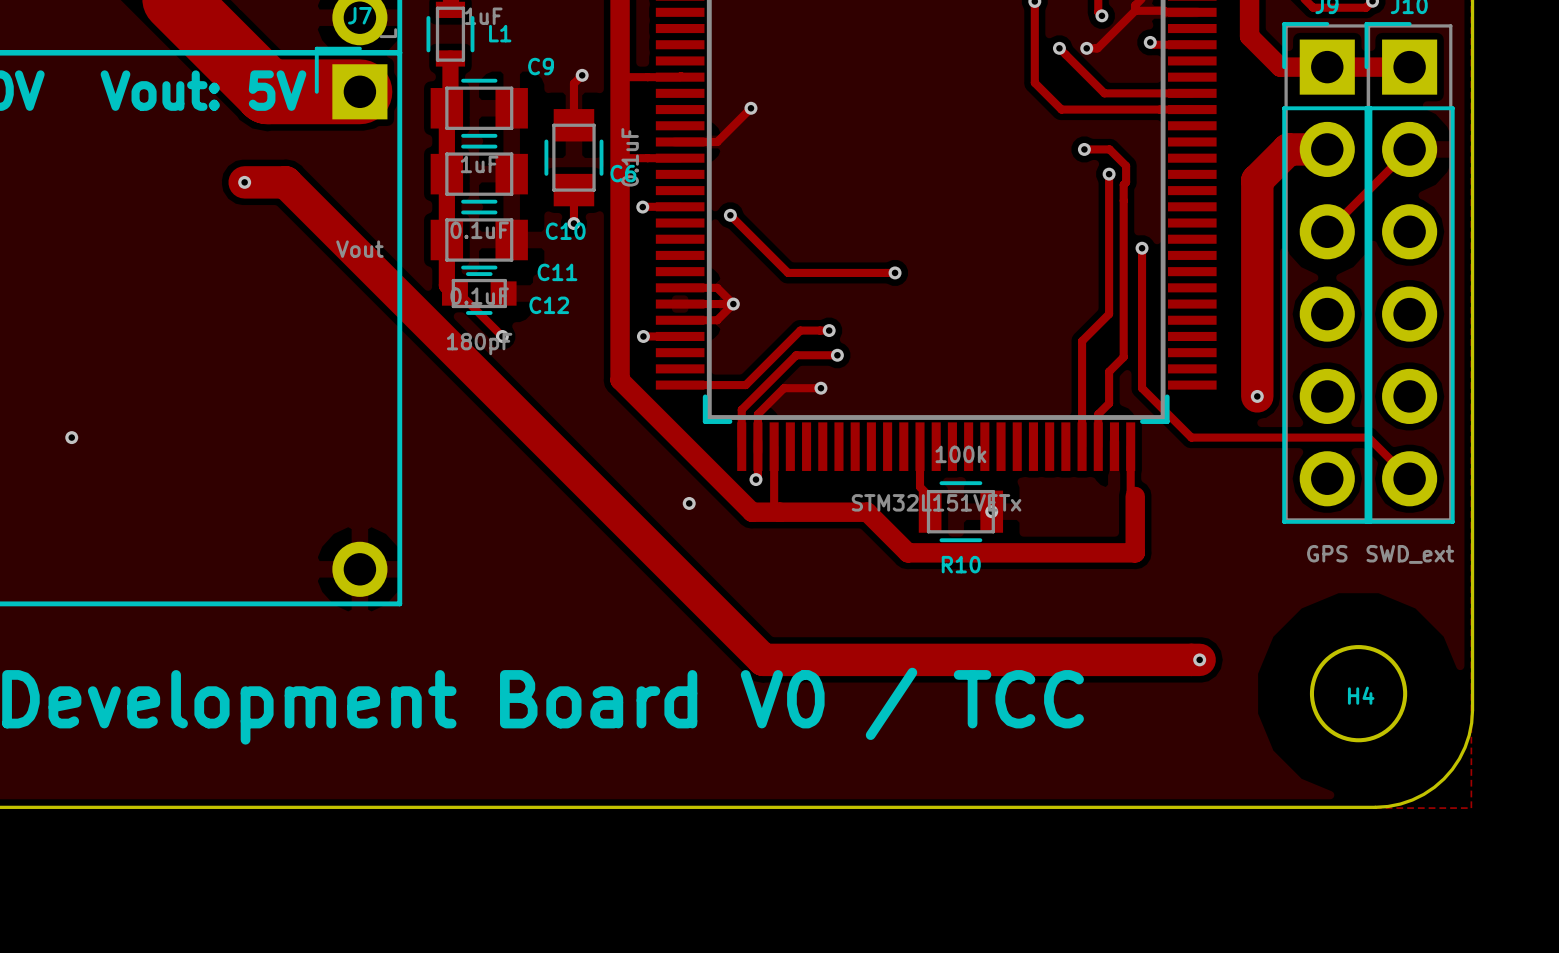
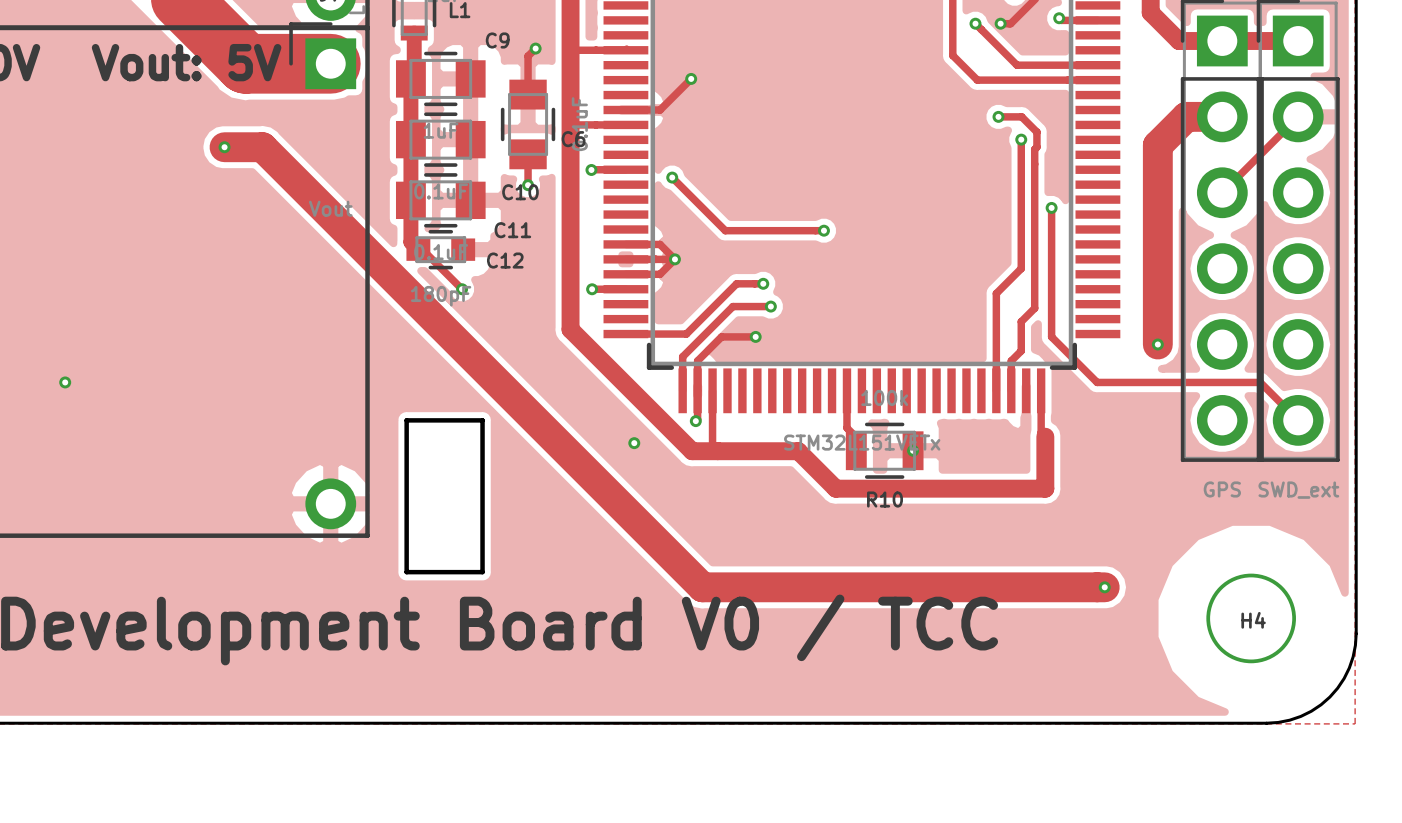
board edge: none -> (406, 420) (406, 572) (482, 572) (482, 420) (406, 420)

